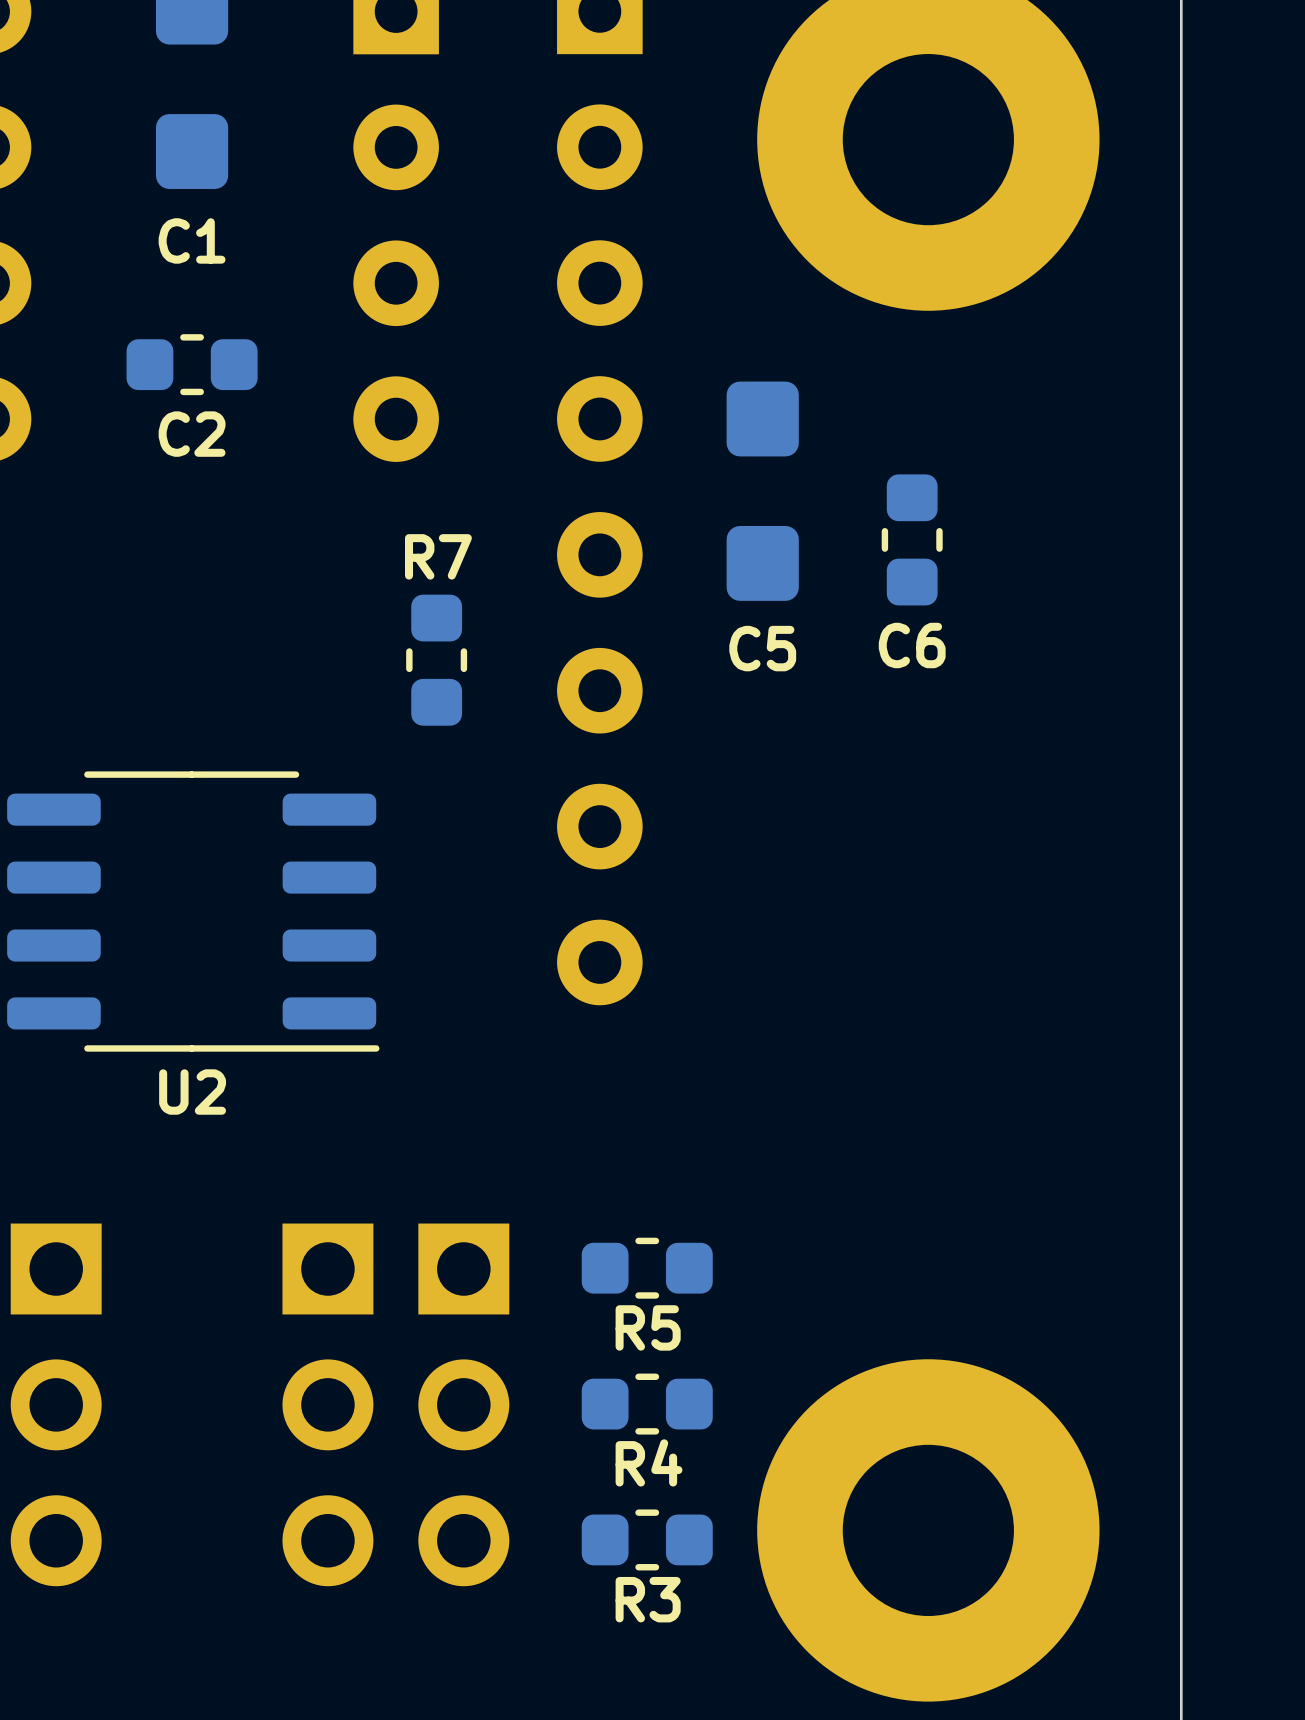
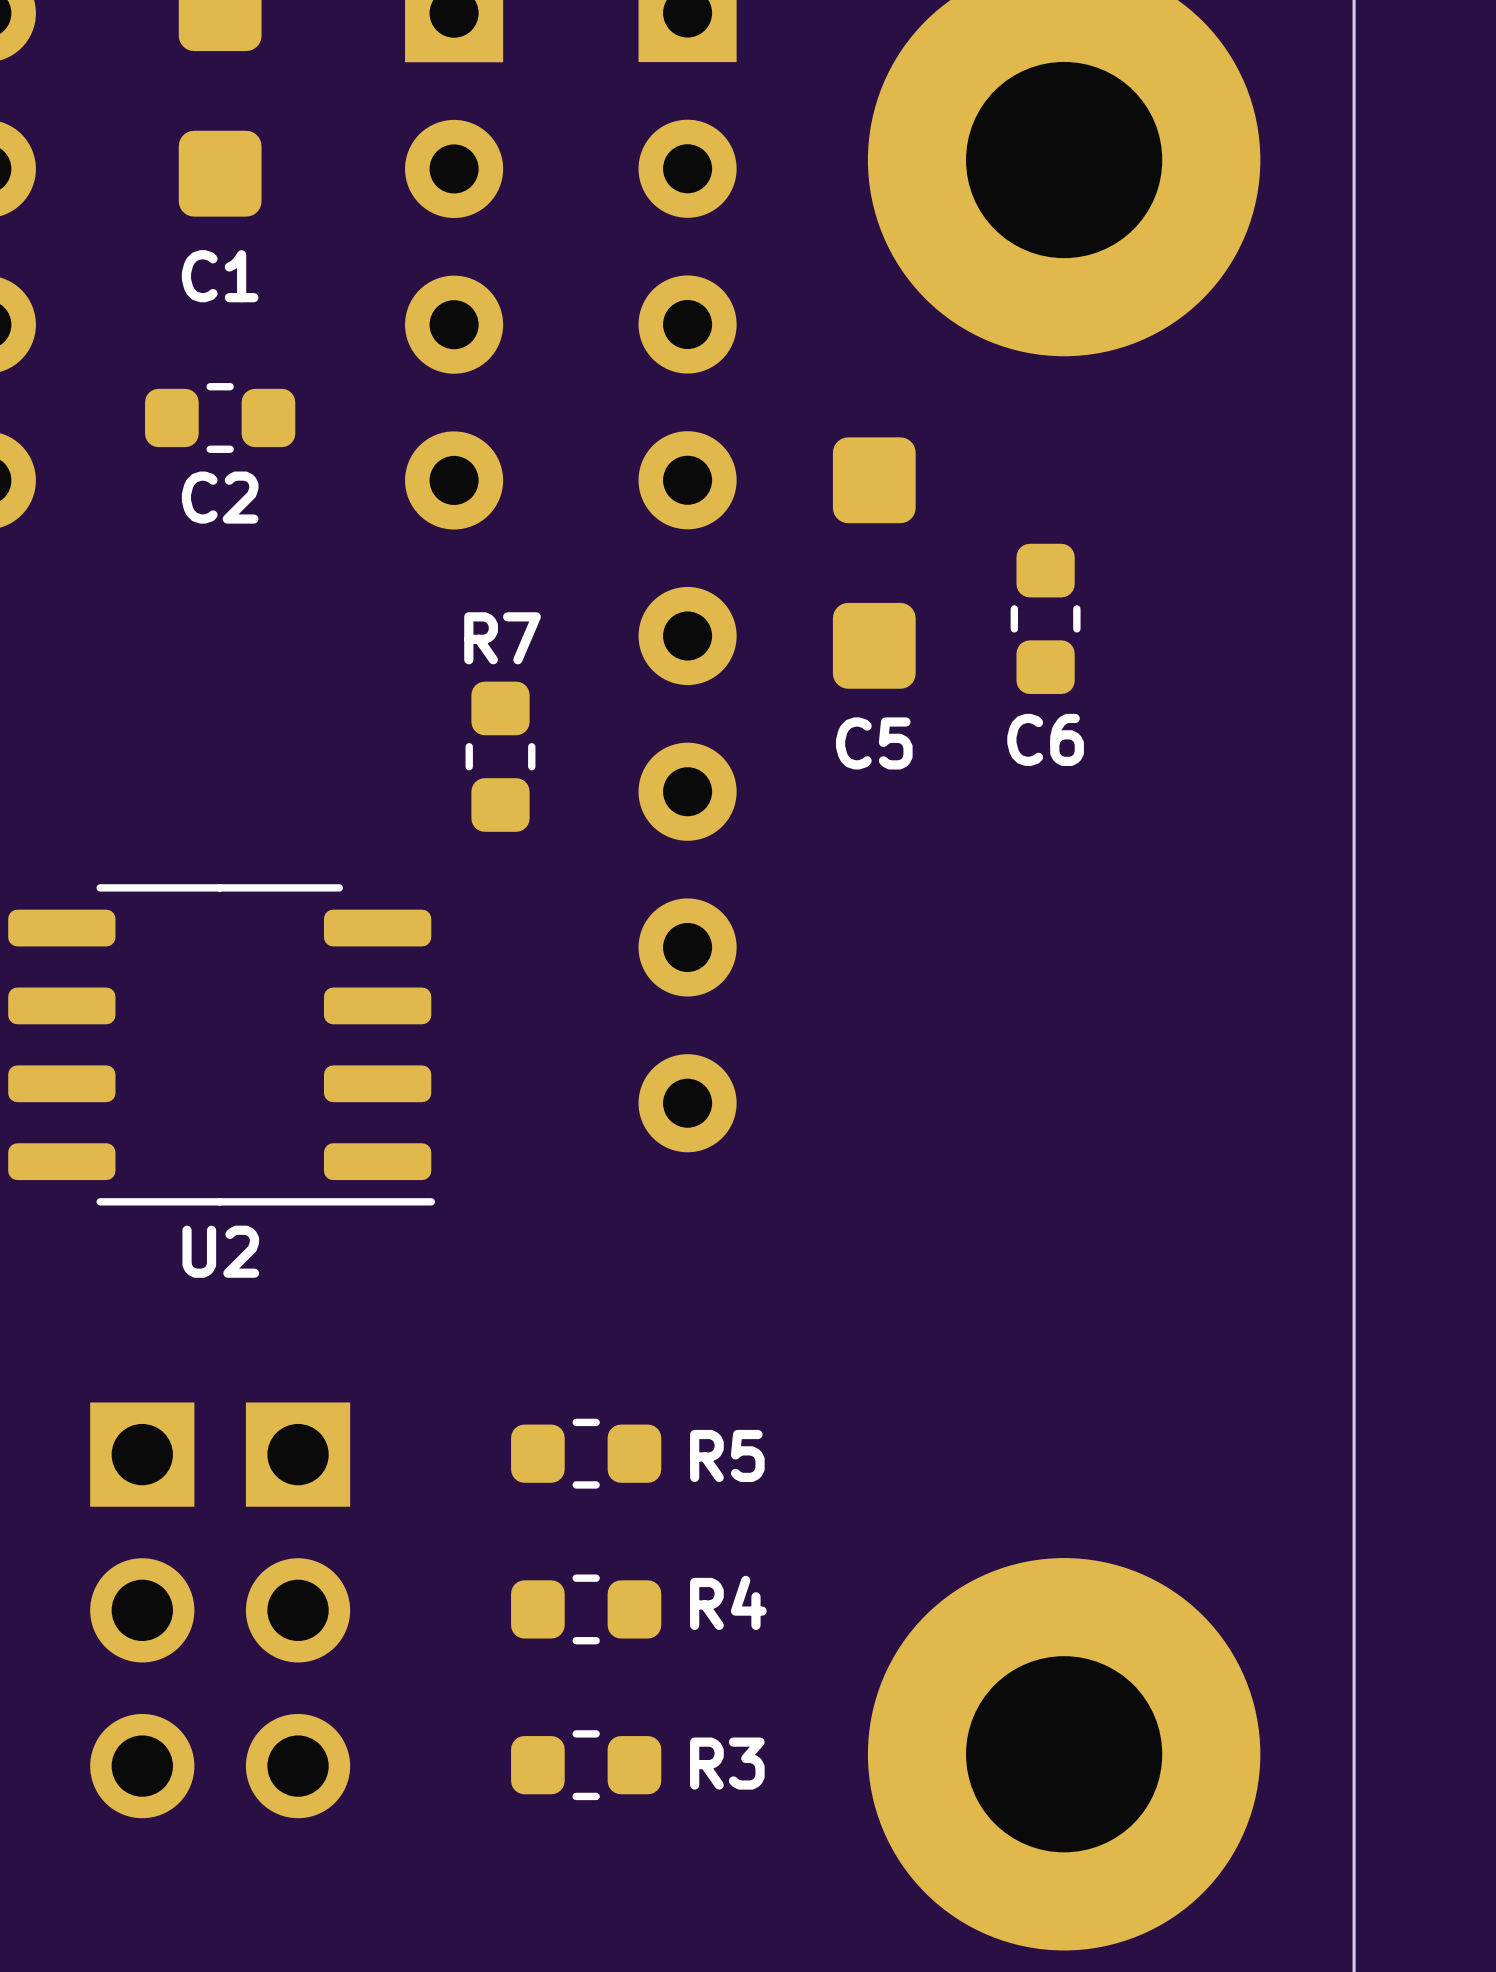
R5 position: (647, 1268) -> (586, 1453)
R5 name position: R5 (648, 1327) -> R5 (727, 1455)
part position: (56, 1404) -> (142, 1610)
part position: (327, 1404) -> (298, 1610)
part: (463, 1404) -> none
R4 position: (647, 1404) -> (586, 1609)
R4 name position: R4 (649, 1462) -> R4 (728, 1602)
R3 position: (647, 1539) -> (586, 1765)
R3 name position: R3 (648, 1599) -> R3 (727, 1763)

